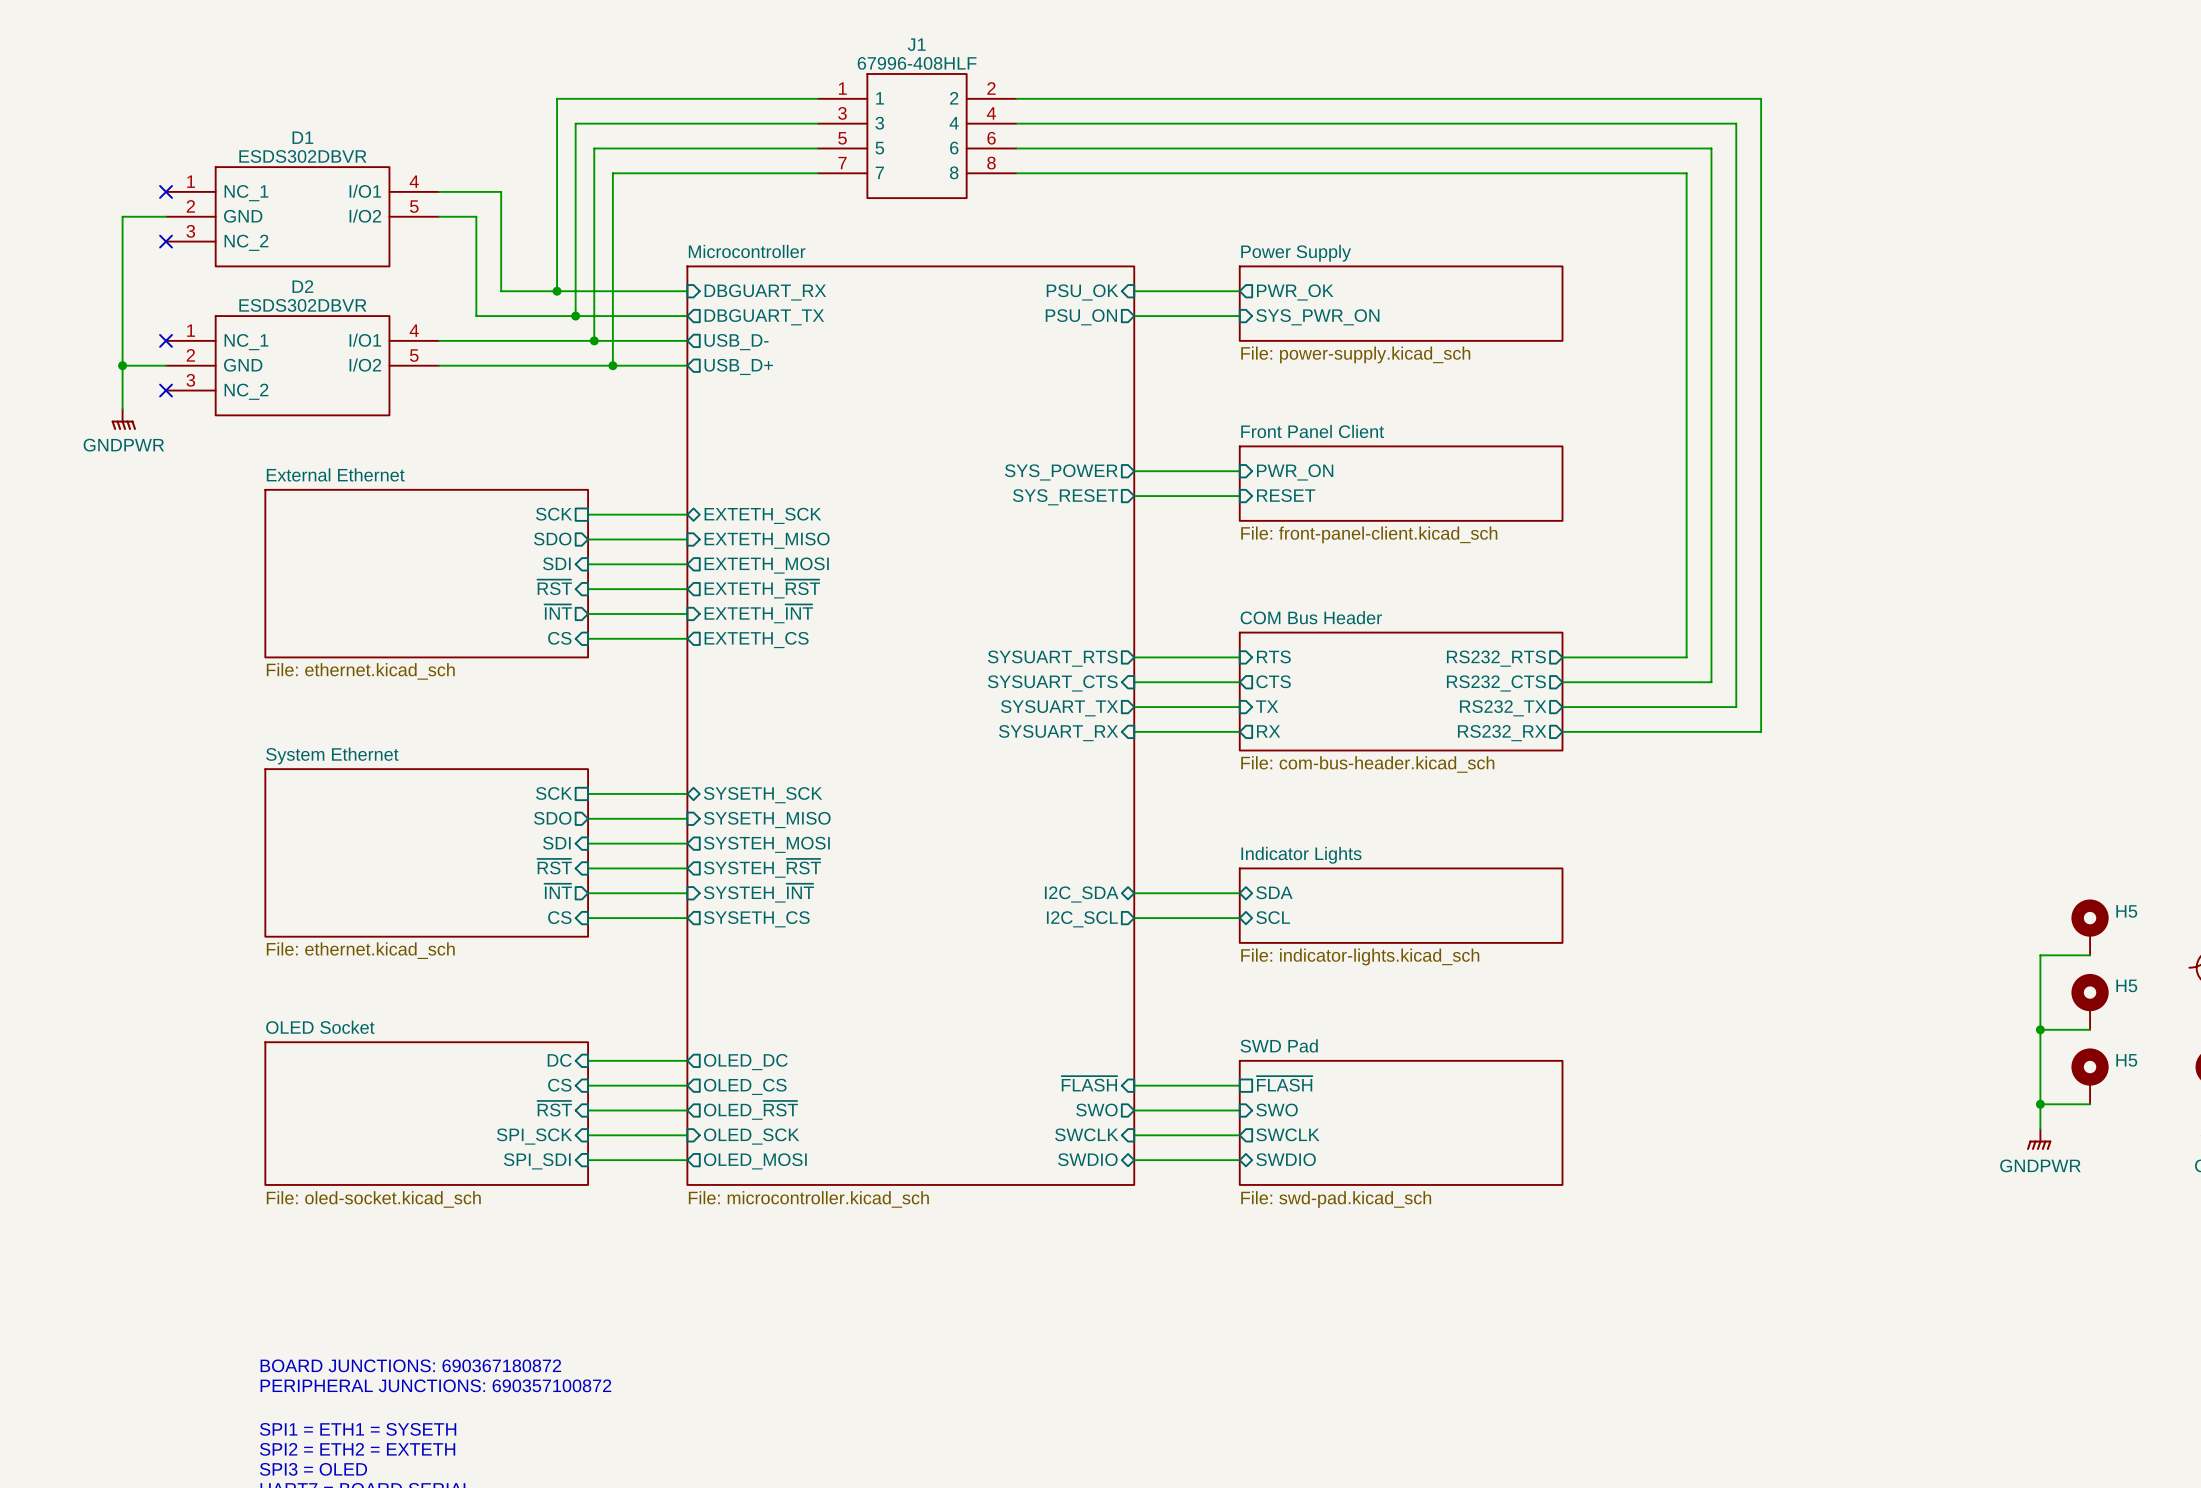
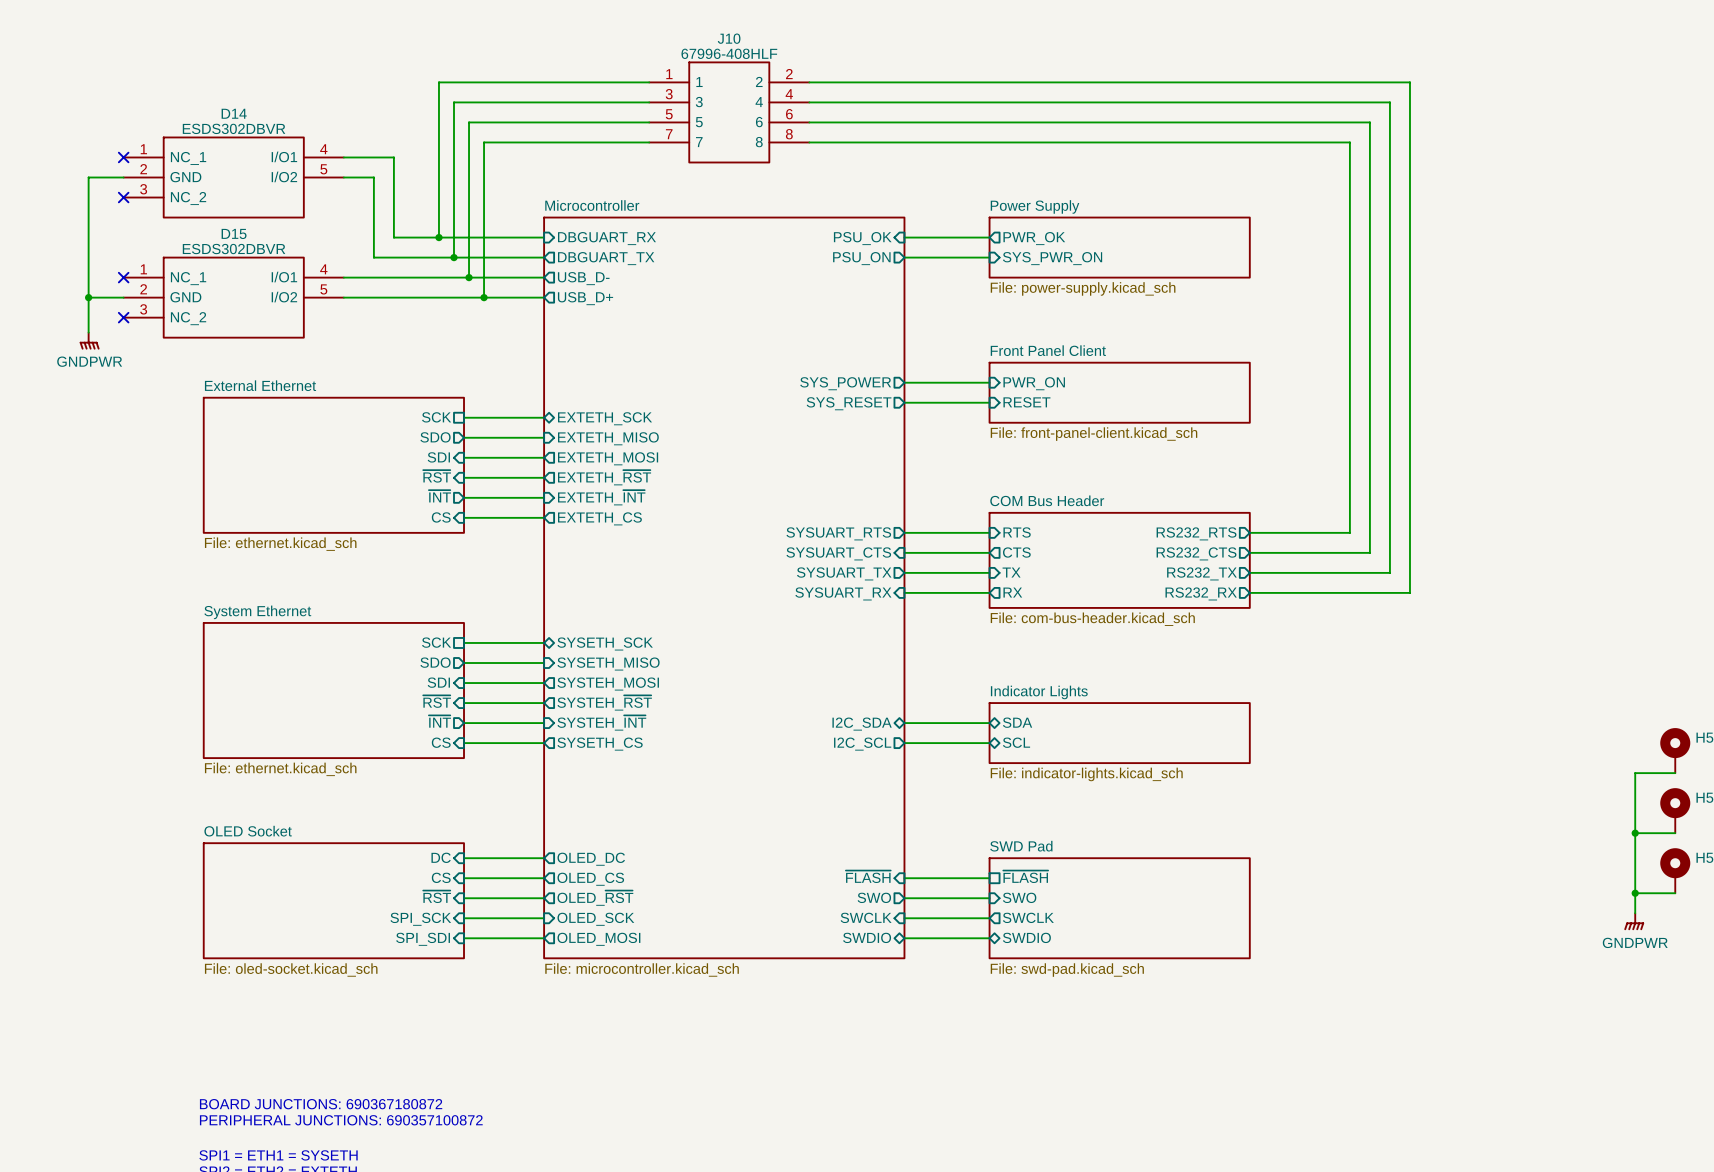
J1 name: J1 (916, 44) -> J10 (729, 38)
D1 name: D1 (302, 137) -> D14 (234, 113)
D2 name: D2 (302, 286) -> D15 (234, 233)

